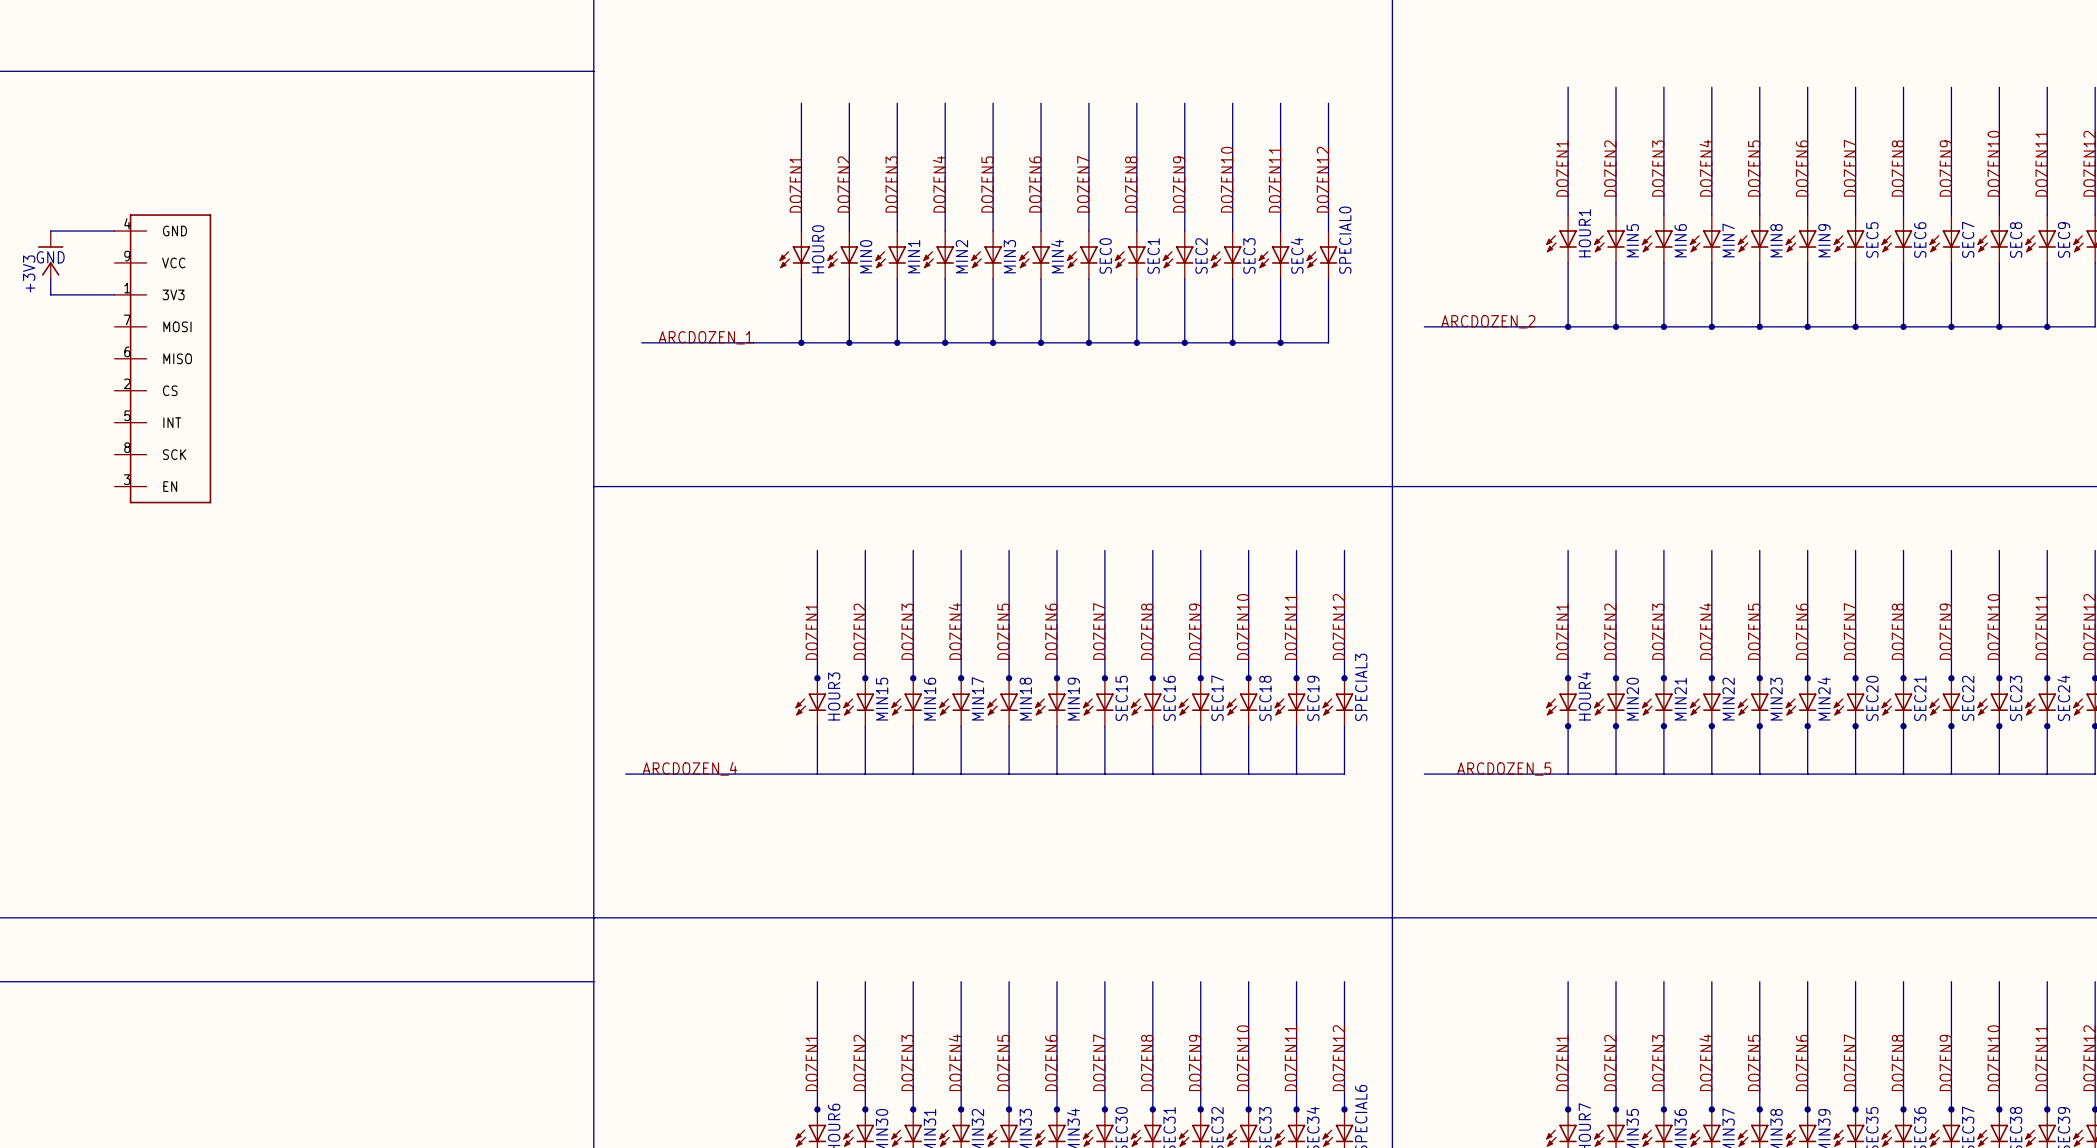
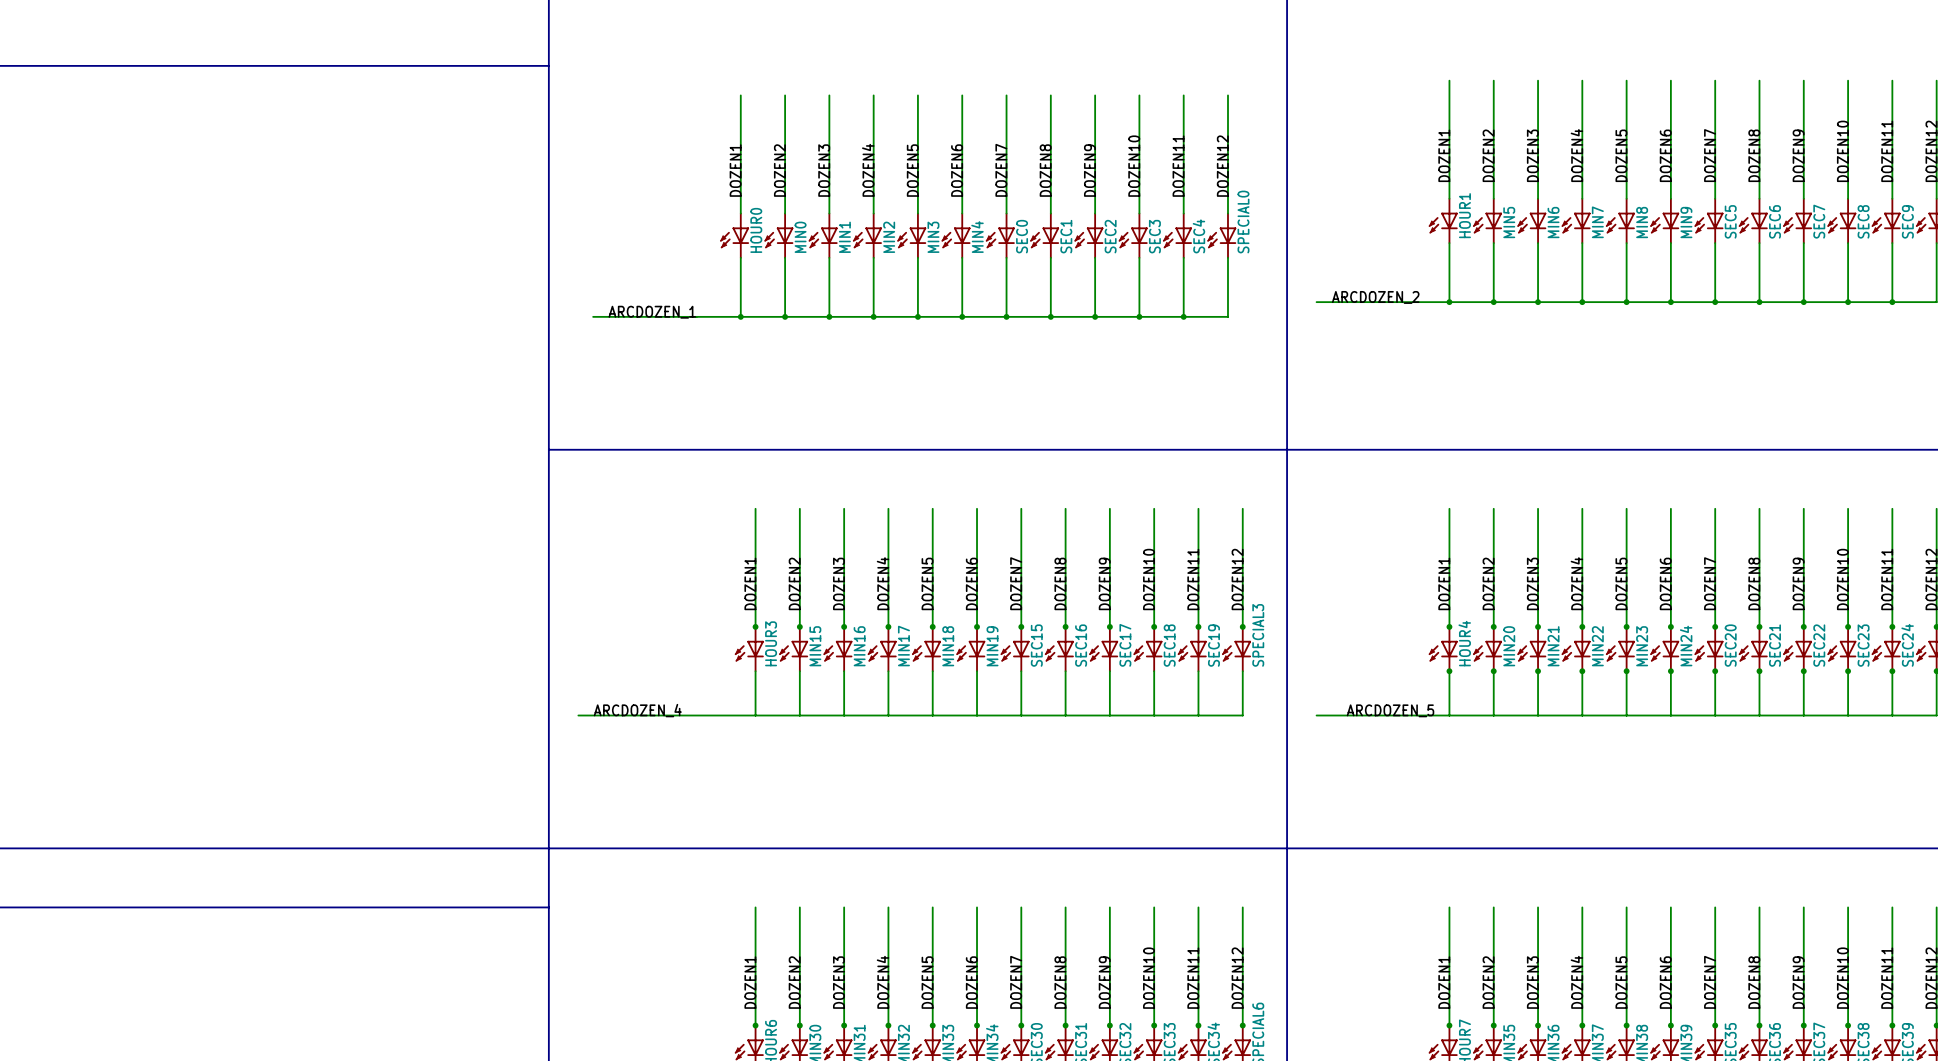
wire: (50, 231) (114, 231) -> none
power symbol: GND (50, 239) -> none
power symbol: +3V3 (50, 270) -> none
wire: (50, 278) (50, 294) (114, 294) -> none
part: (162, 358) -> none

